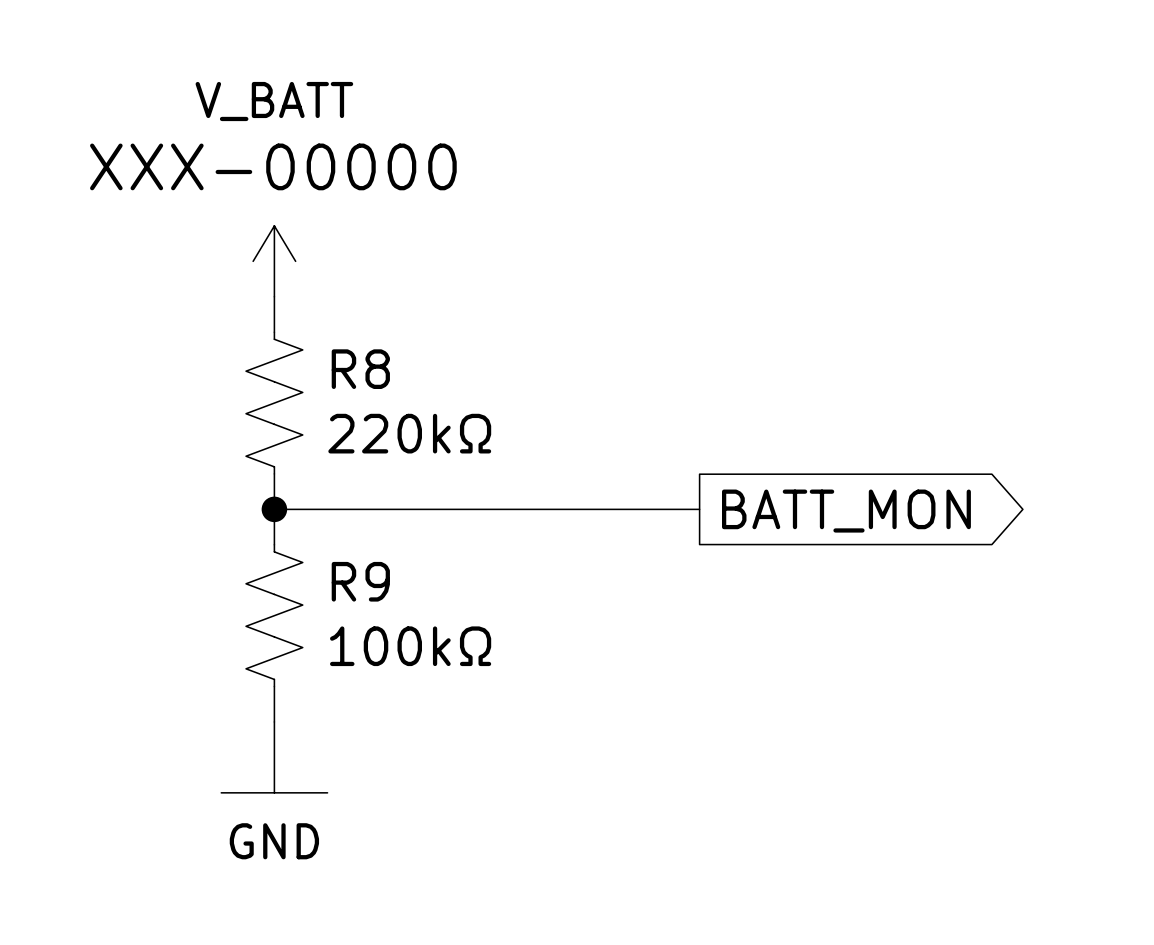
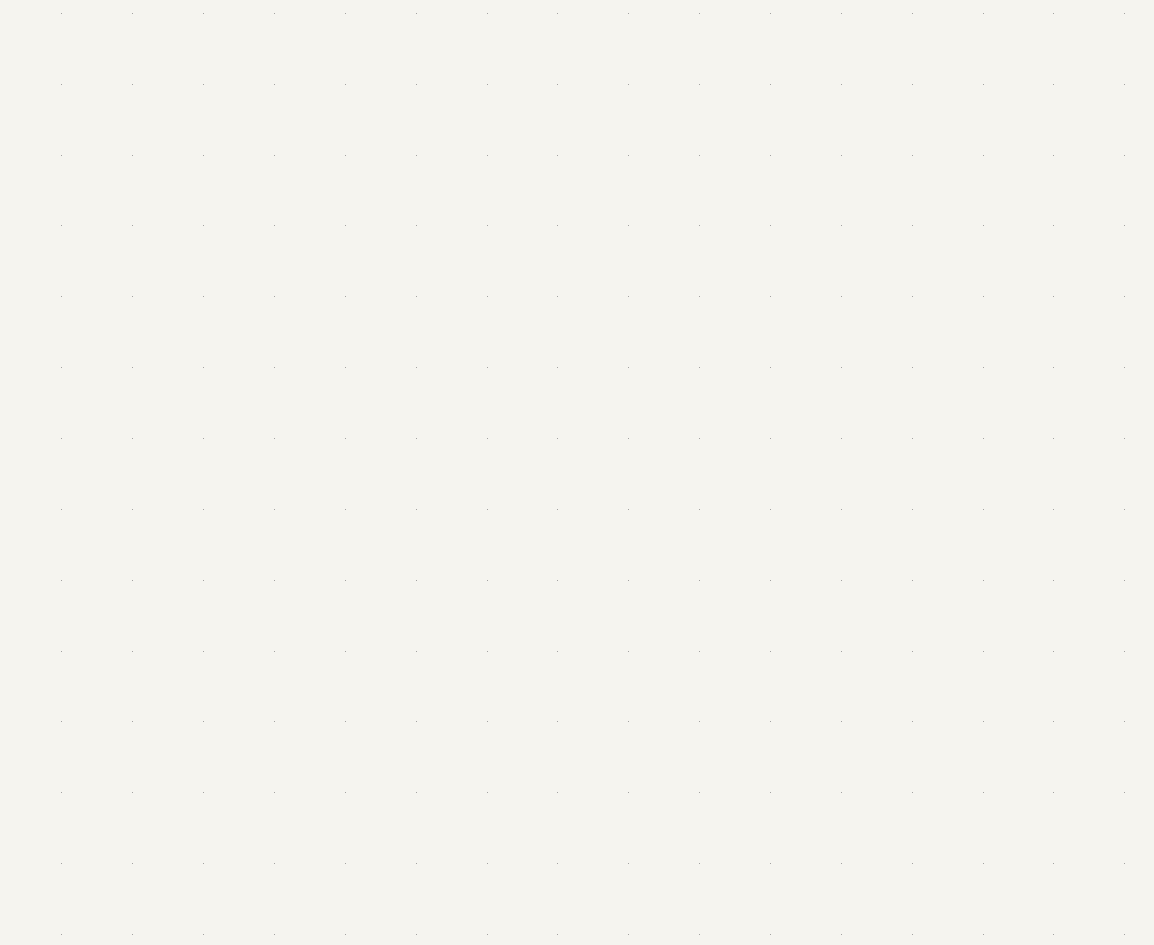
power symbol: V_BATT (274, 261) -> none
R8: 220kΩ (274, 403) -> none
wire: (274, 509) (699, 509) -> none
junction: (274, 509) -> none
global label: BATT_MON (846, 511) -> none
R9: 100kΩ (274, 615) -> none
power symbol: GND (274, 757) -> none

